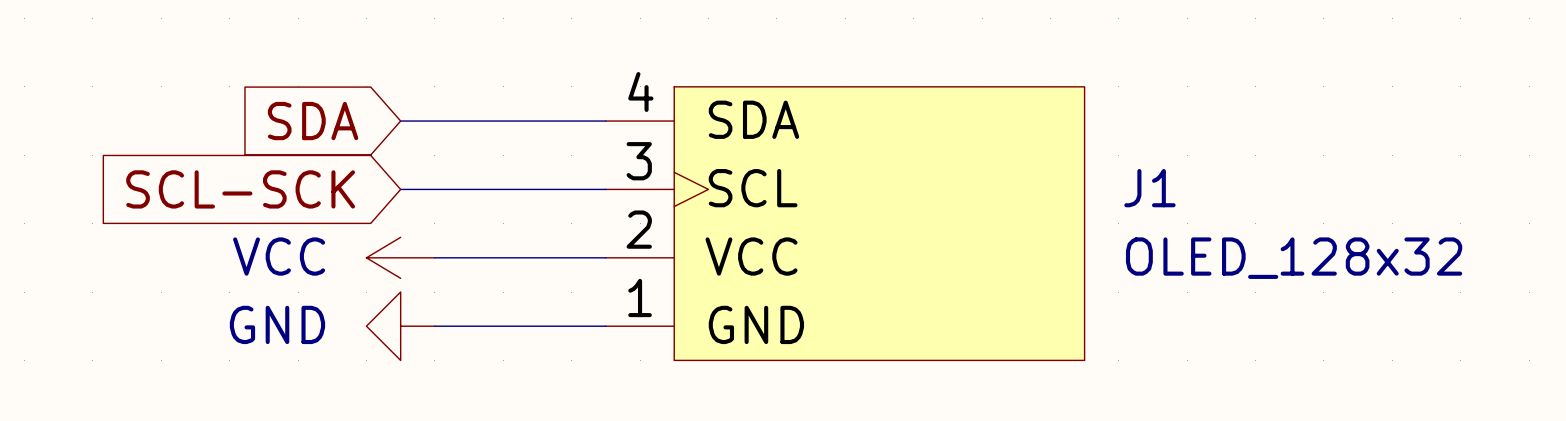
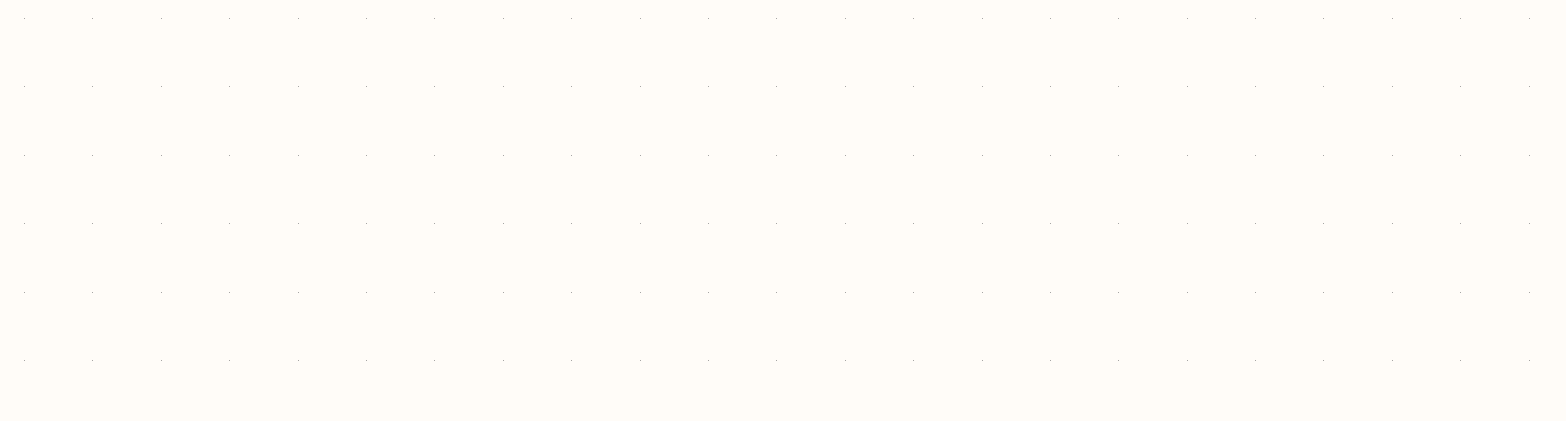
global label: SDA (313, 121) -> none
wire: (400, 121) (605, 121) -> none
global label: SCL-SCK (240, 189) -> none
wire: (400, 189) (605, 189) -> none
J1: OLED_128x32 (845, 223) -> none
power symbol: VCC (400, 257) -> none
wire: (434, 257) (605, 257) -> none
power symbol: GND (400, 326) -> none
wire: (434, 326) (605, 326) -> none

